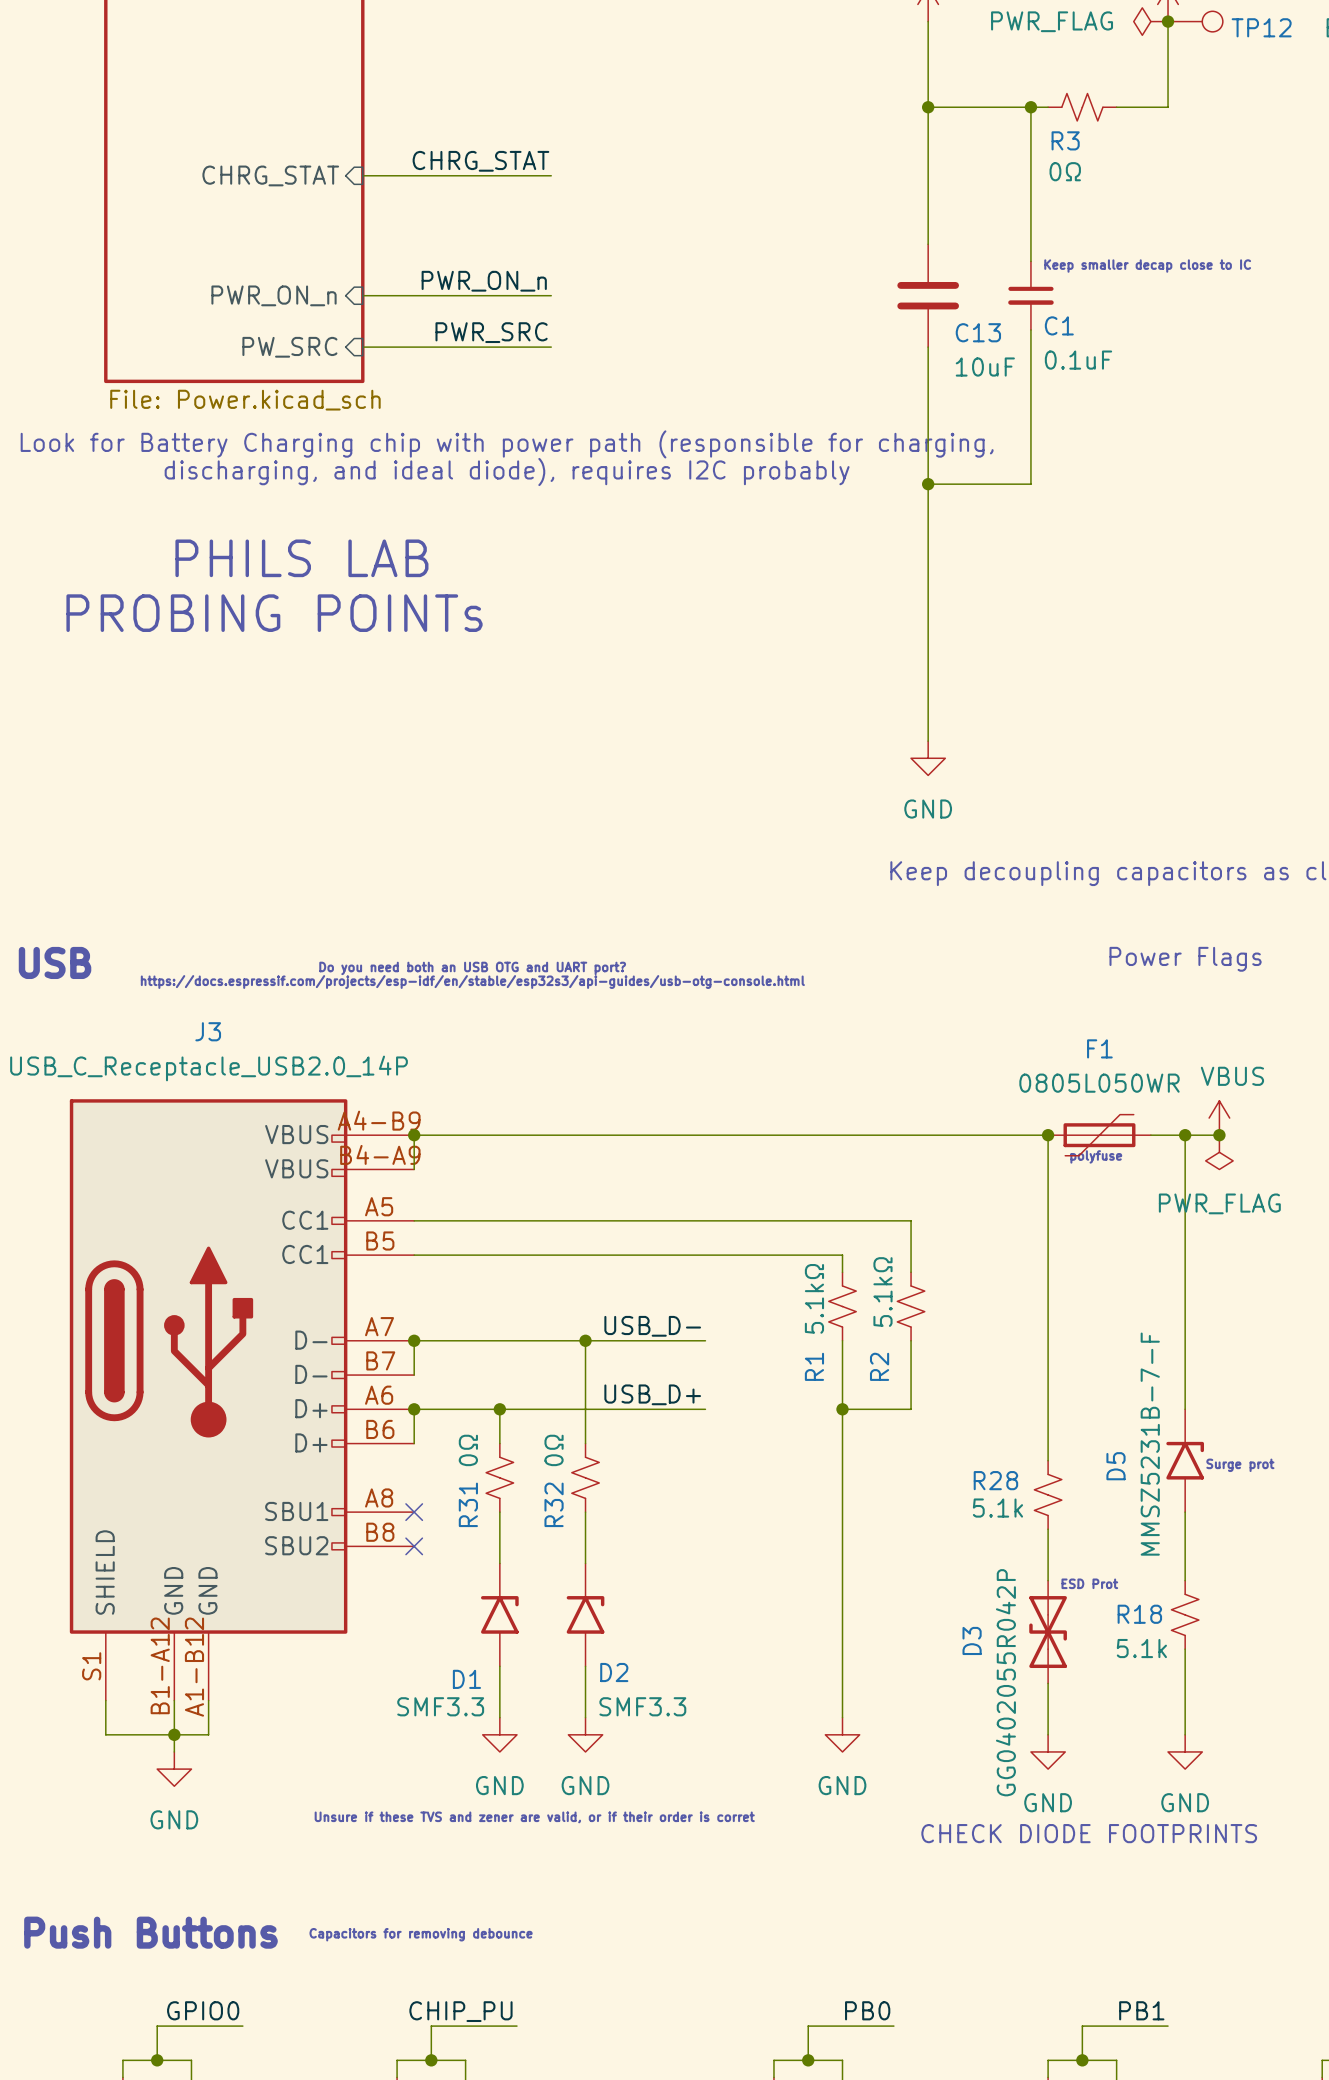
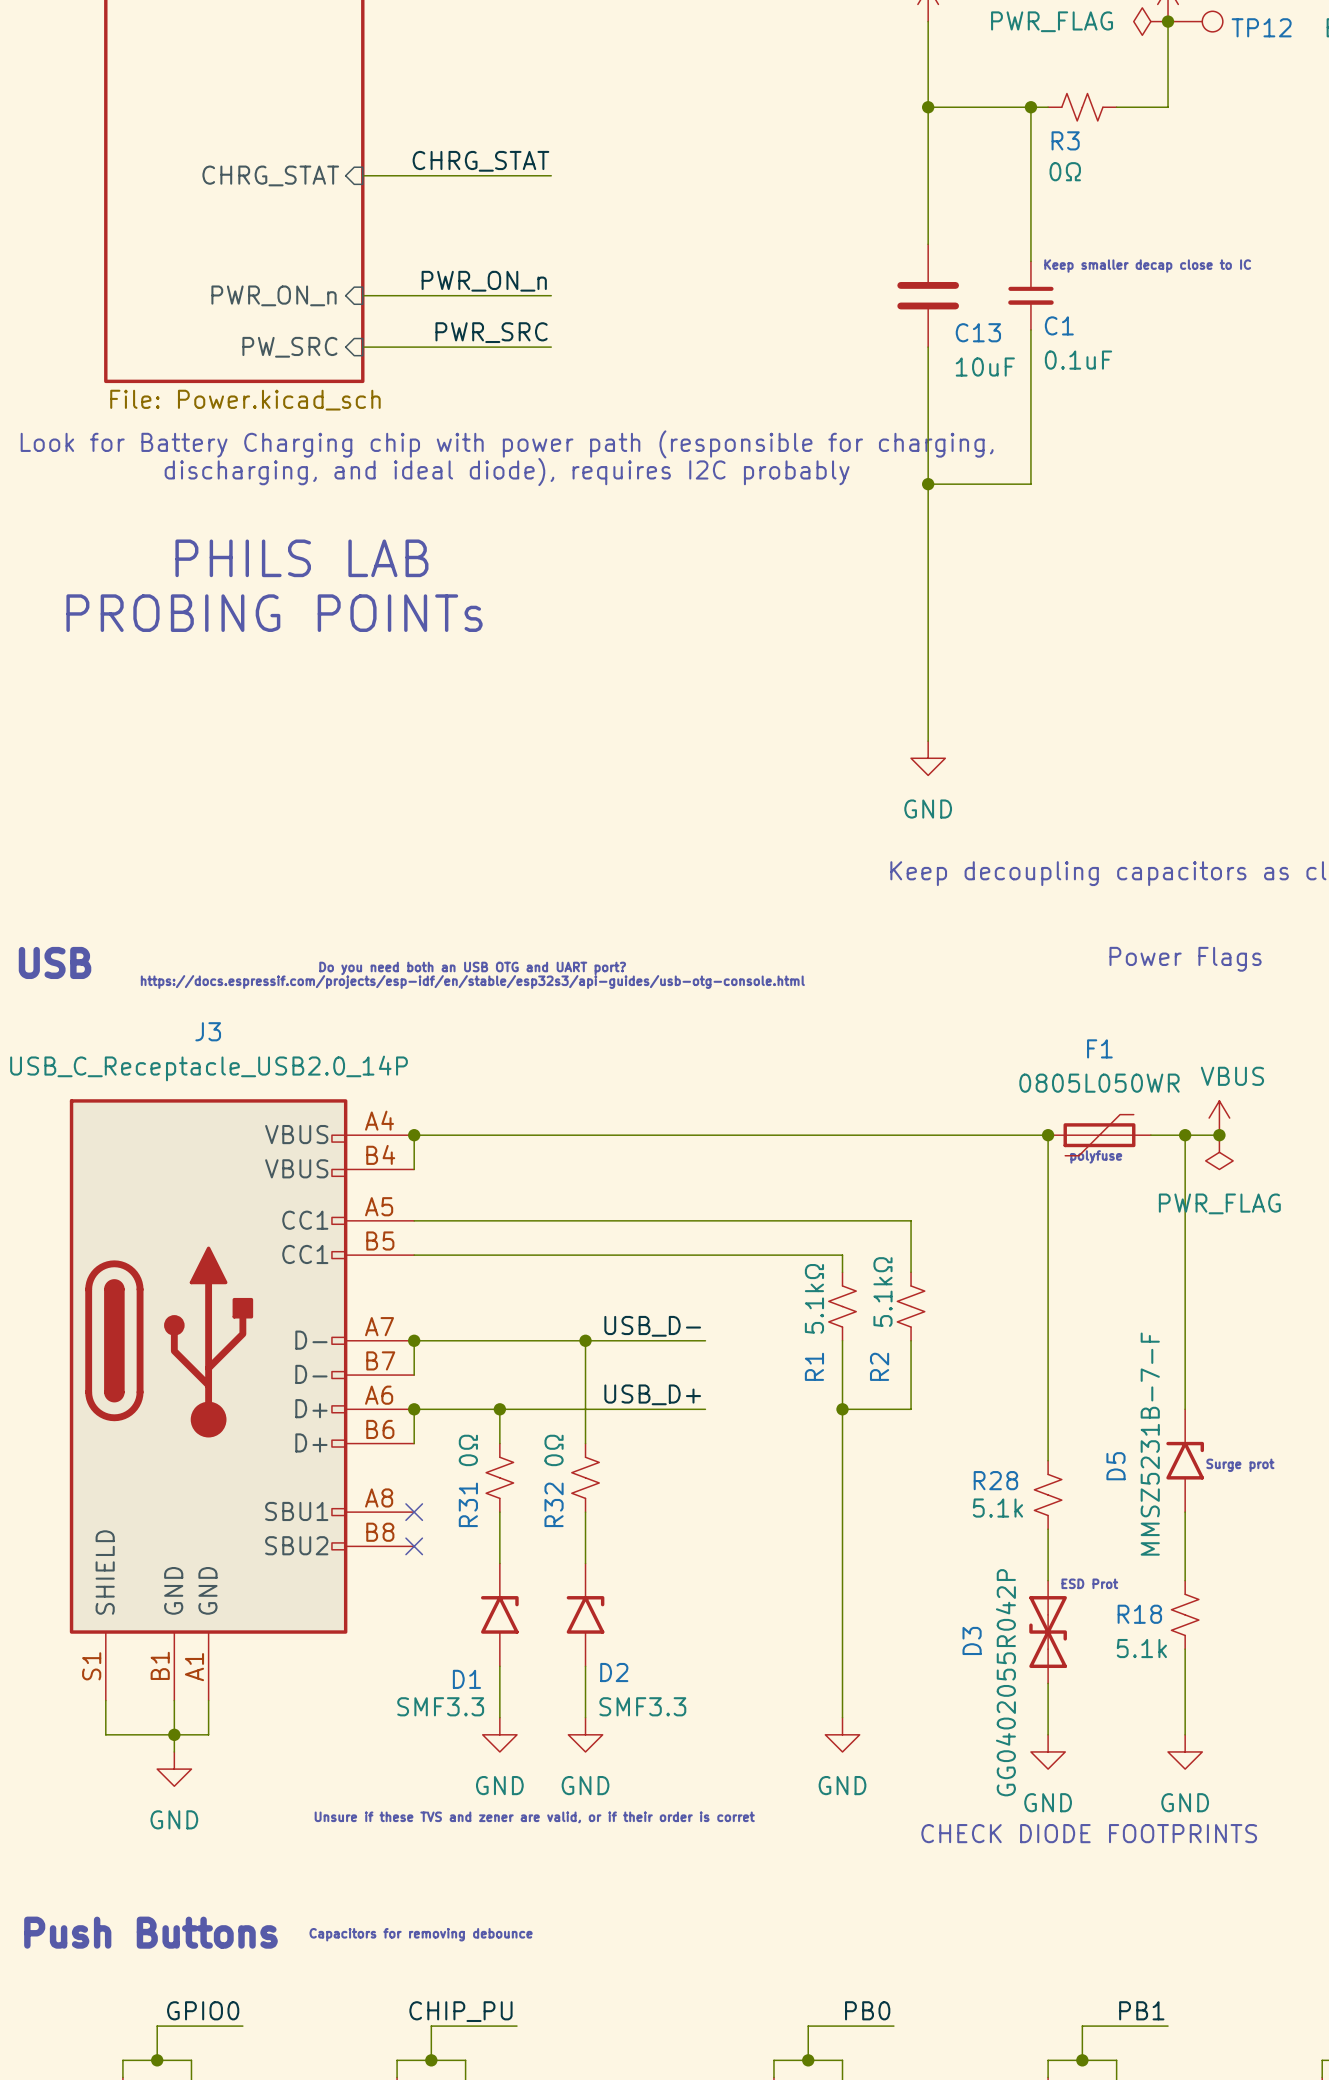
J3 pin number: A4-B9 (379, 1120) -> A4 (379, 1120)
J3 pin number: B4-A9 (380, 1154) -> B4 (380, 1154)
J3 pin number: B1-A12 (160, 1665) -> B1 (160, 1665)
J3 pin number: A1-B12 (194, 1667) -> A1 (194, 1667)

